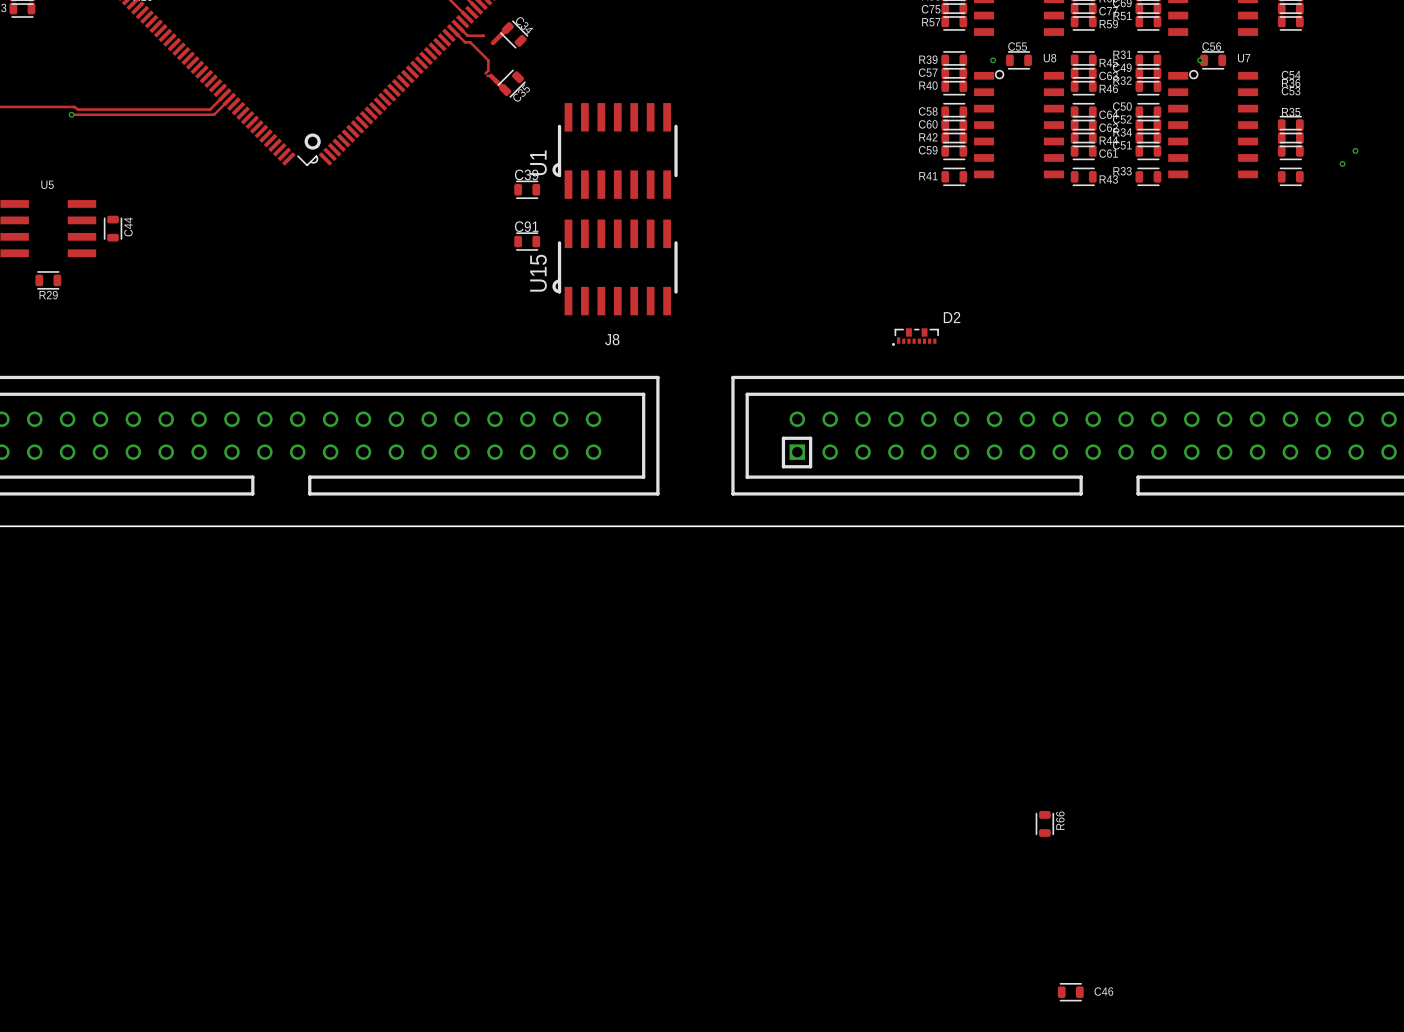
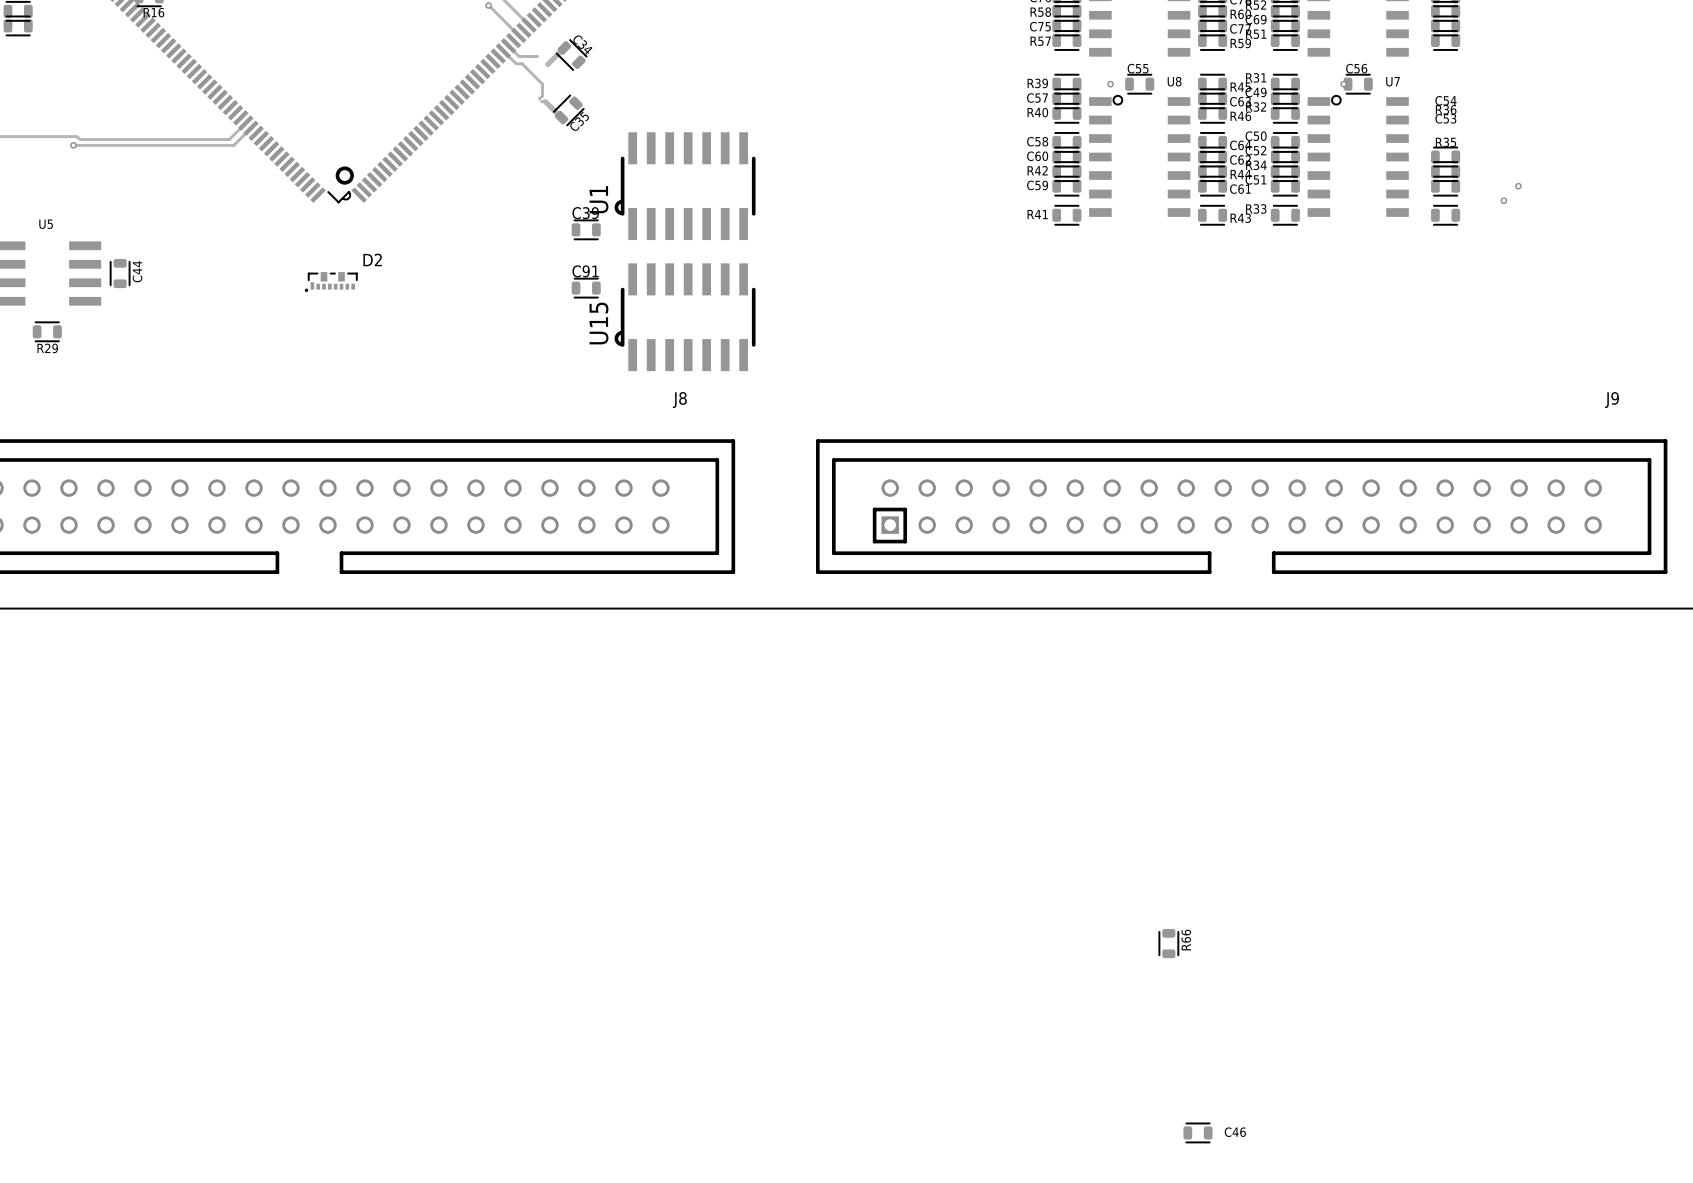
D2 position: (915, 337) -> (331, 281)

